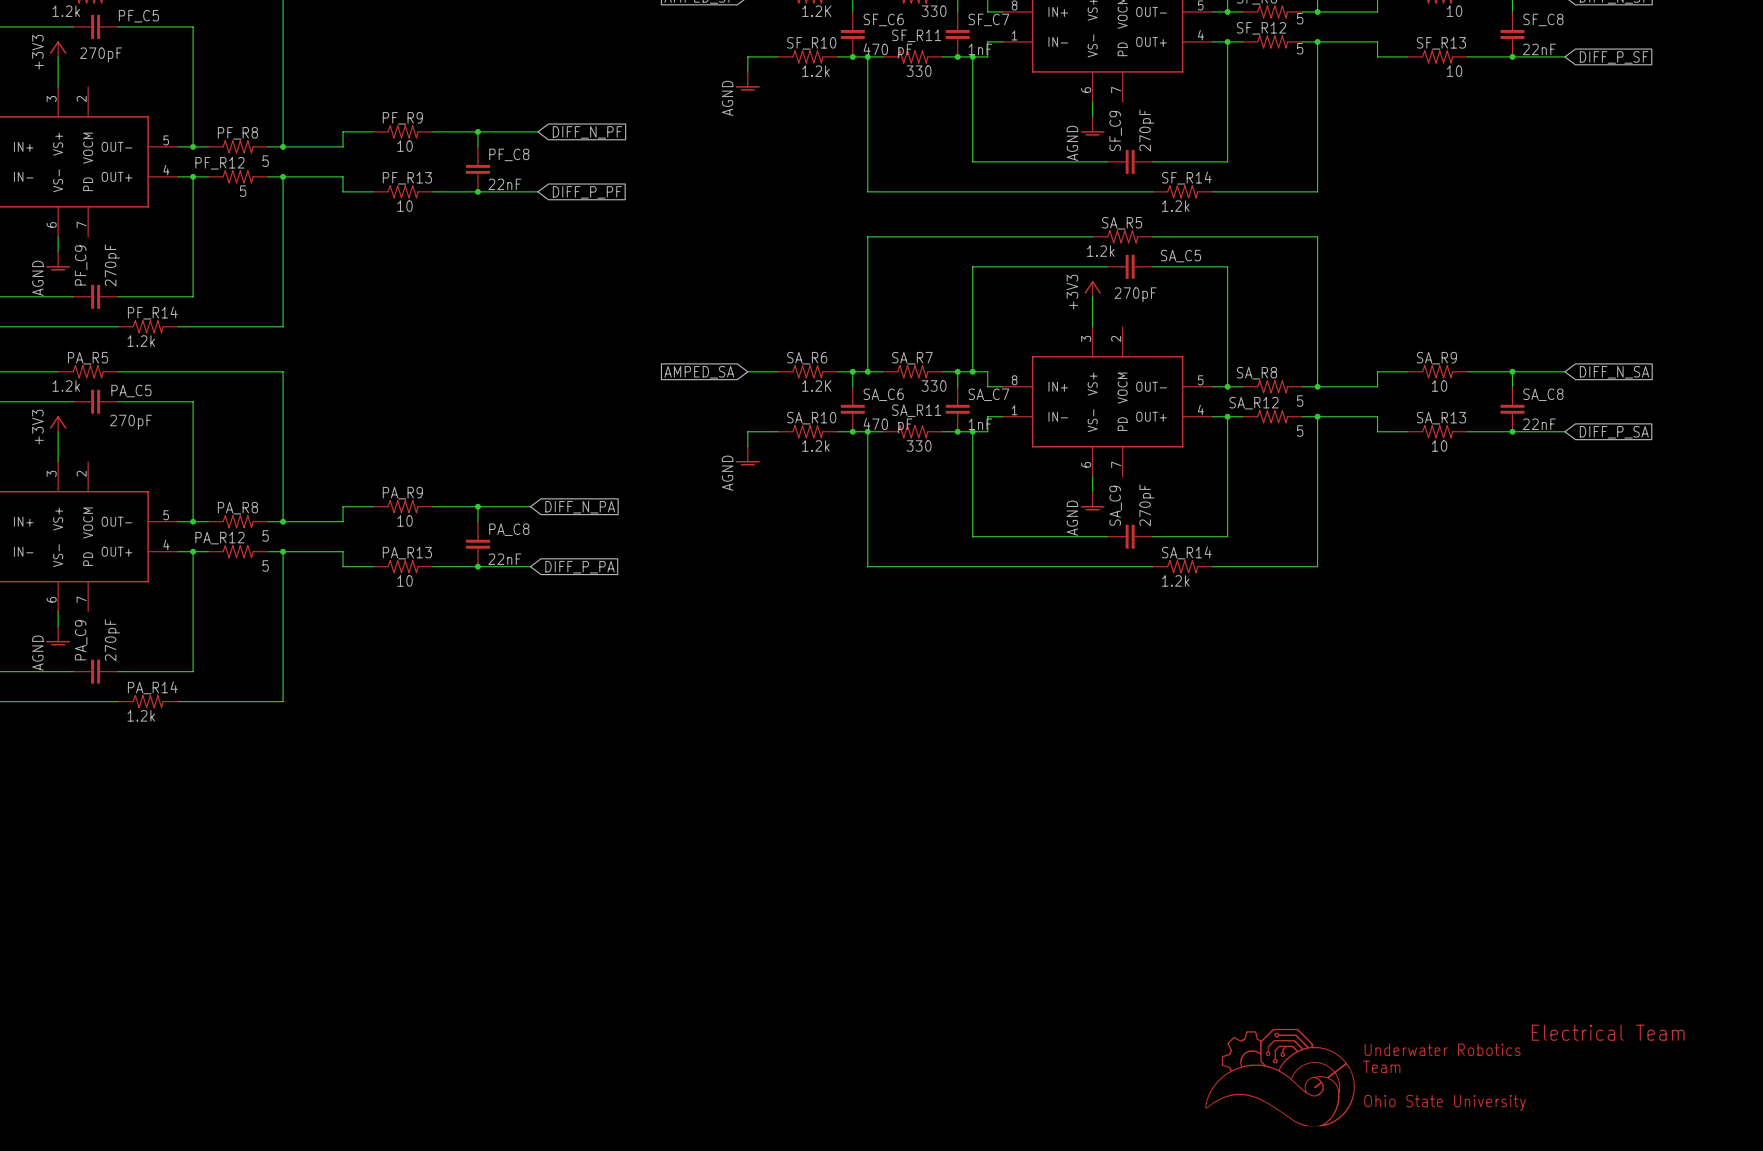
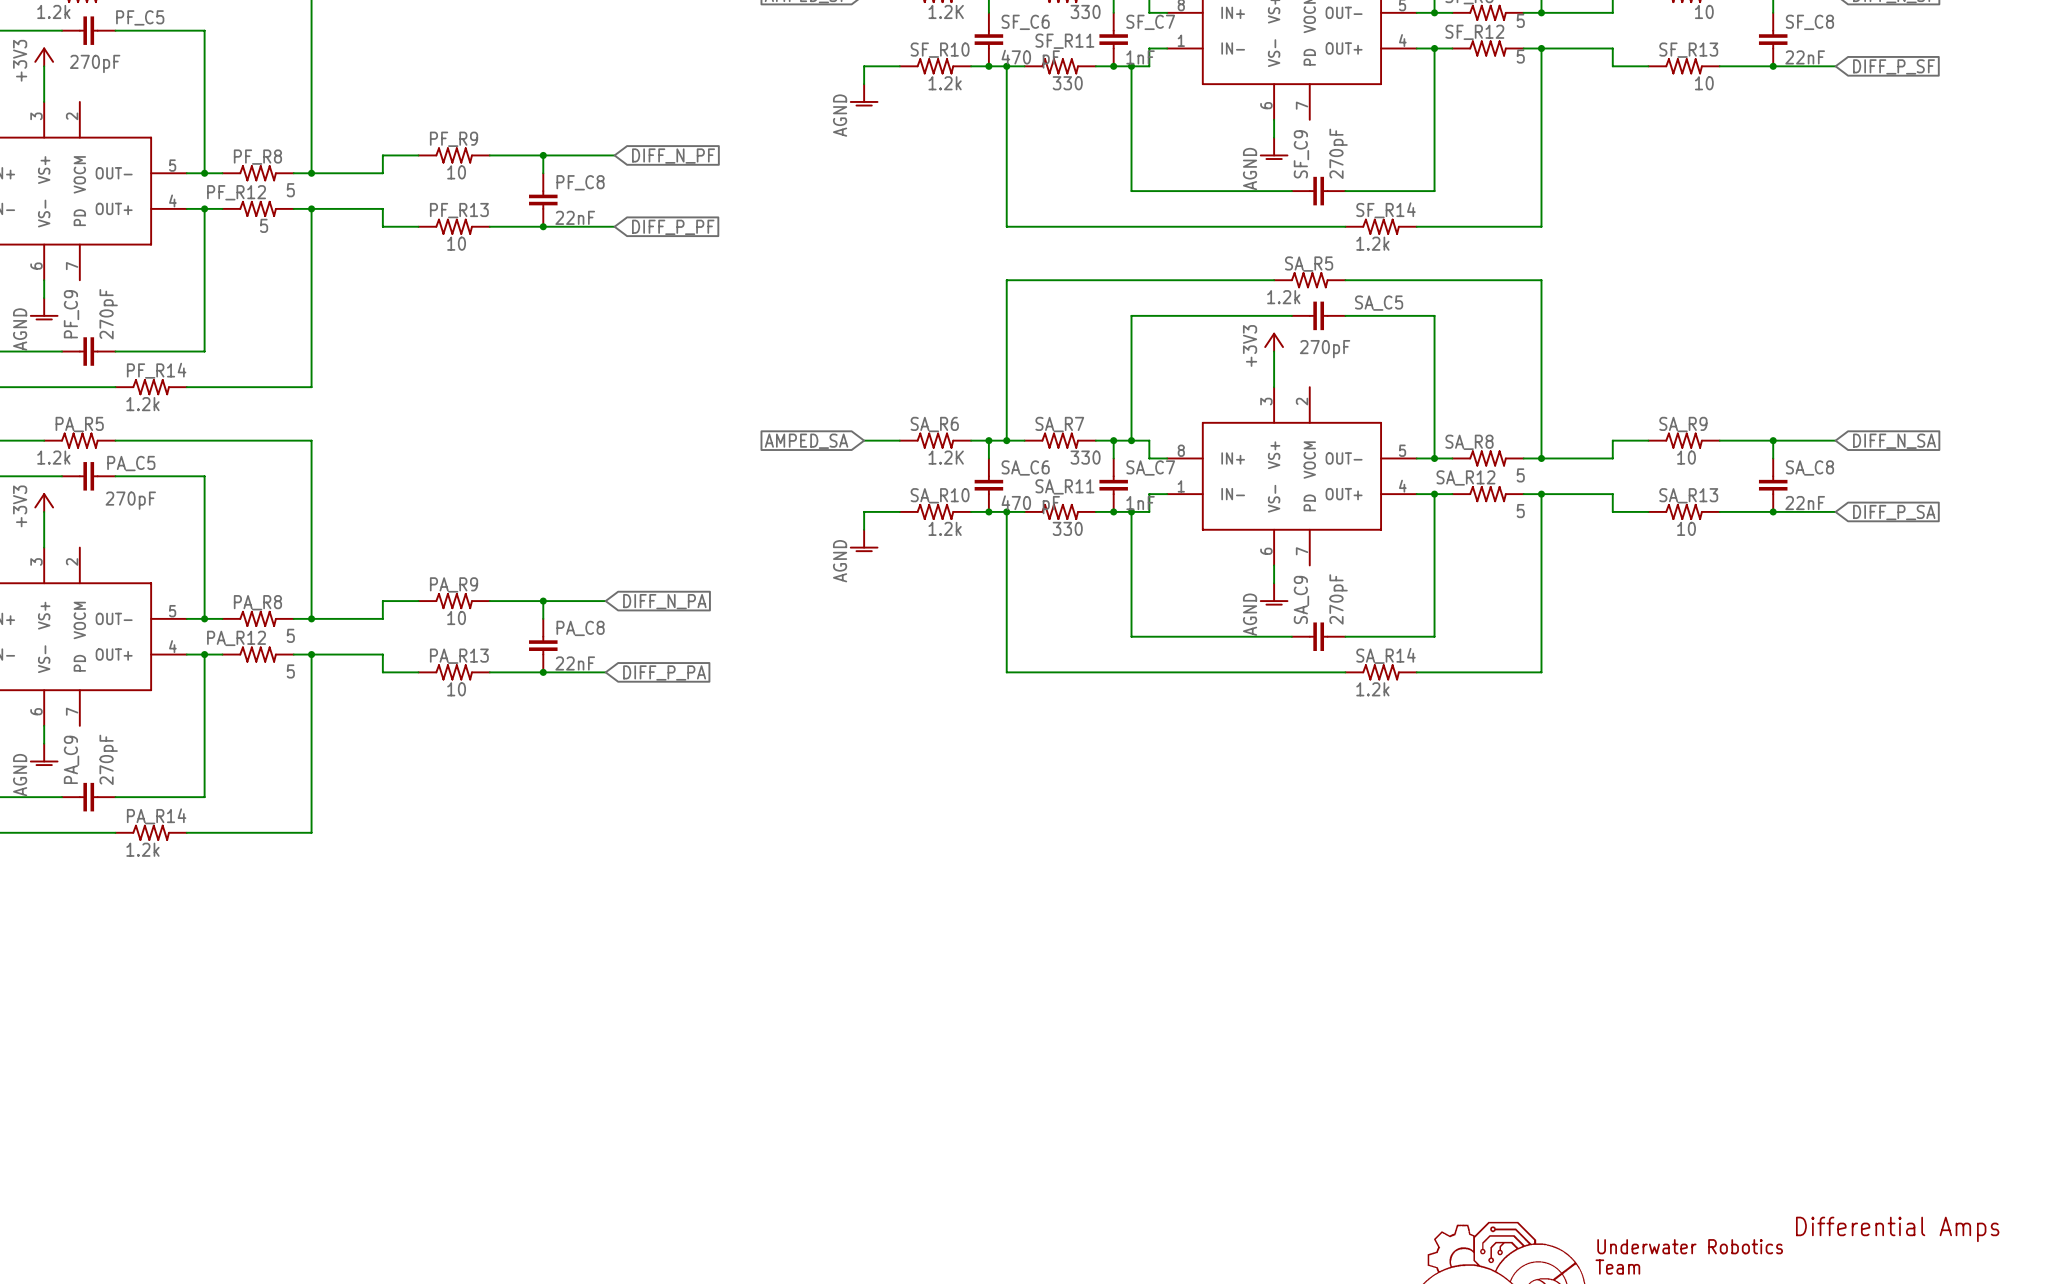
text: Electrical Team (1608, 1032) -> Differential Amps (1897, 1229)

